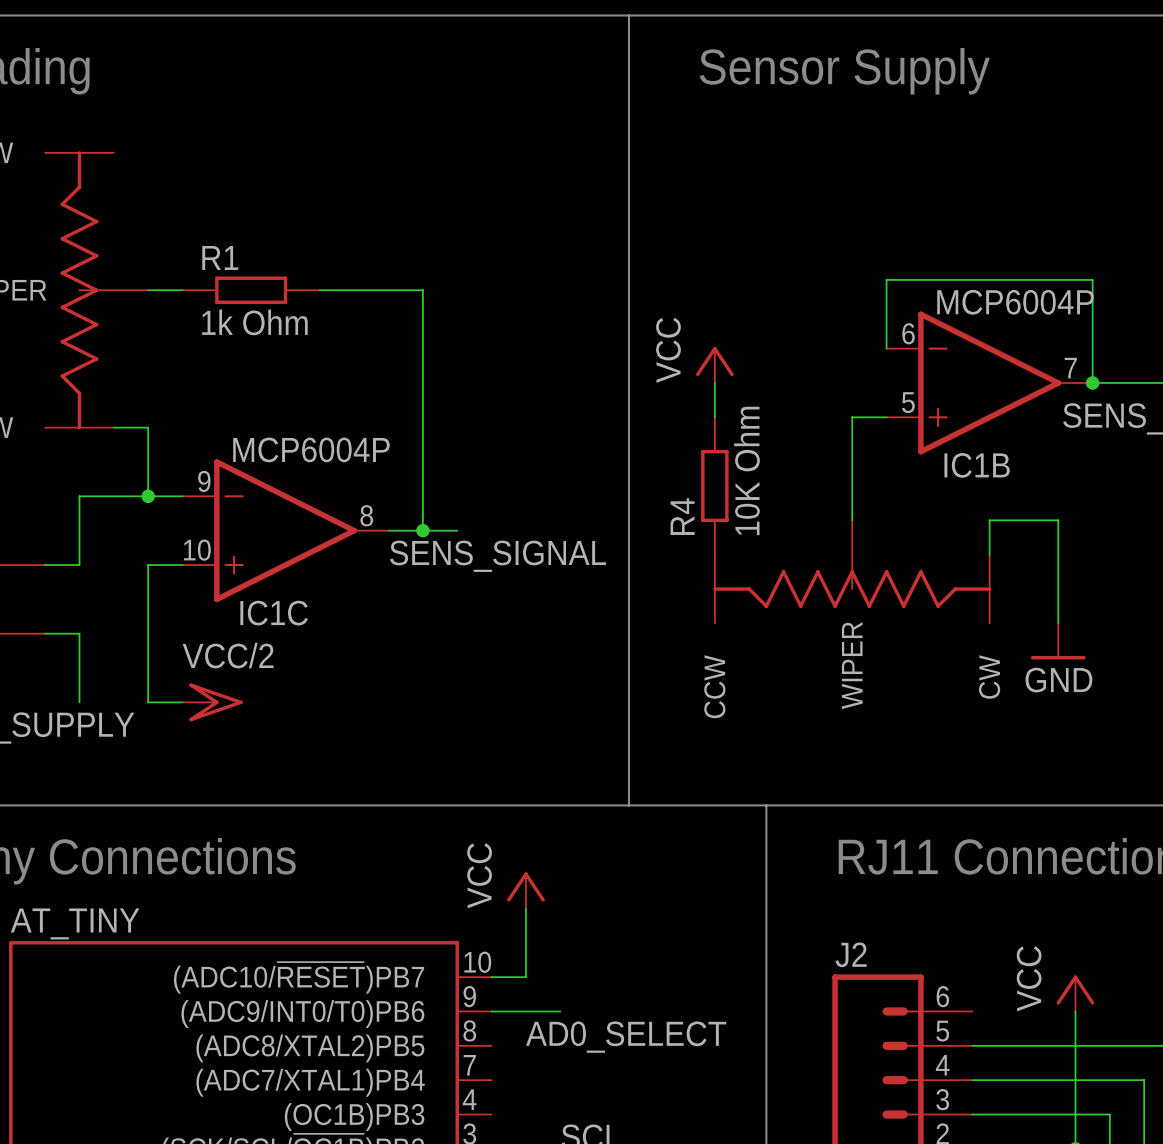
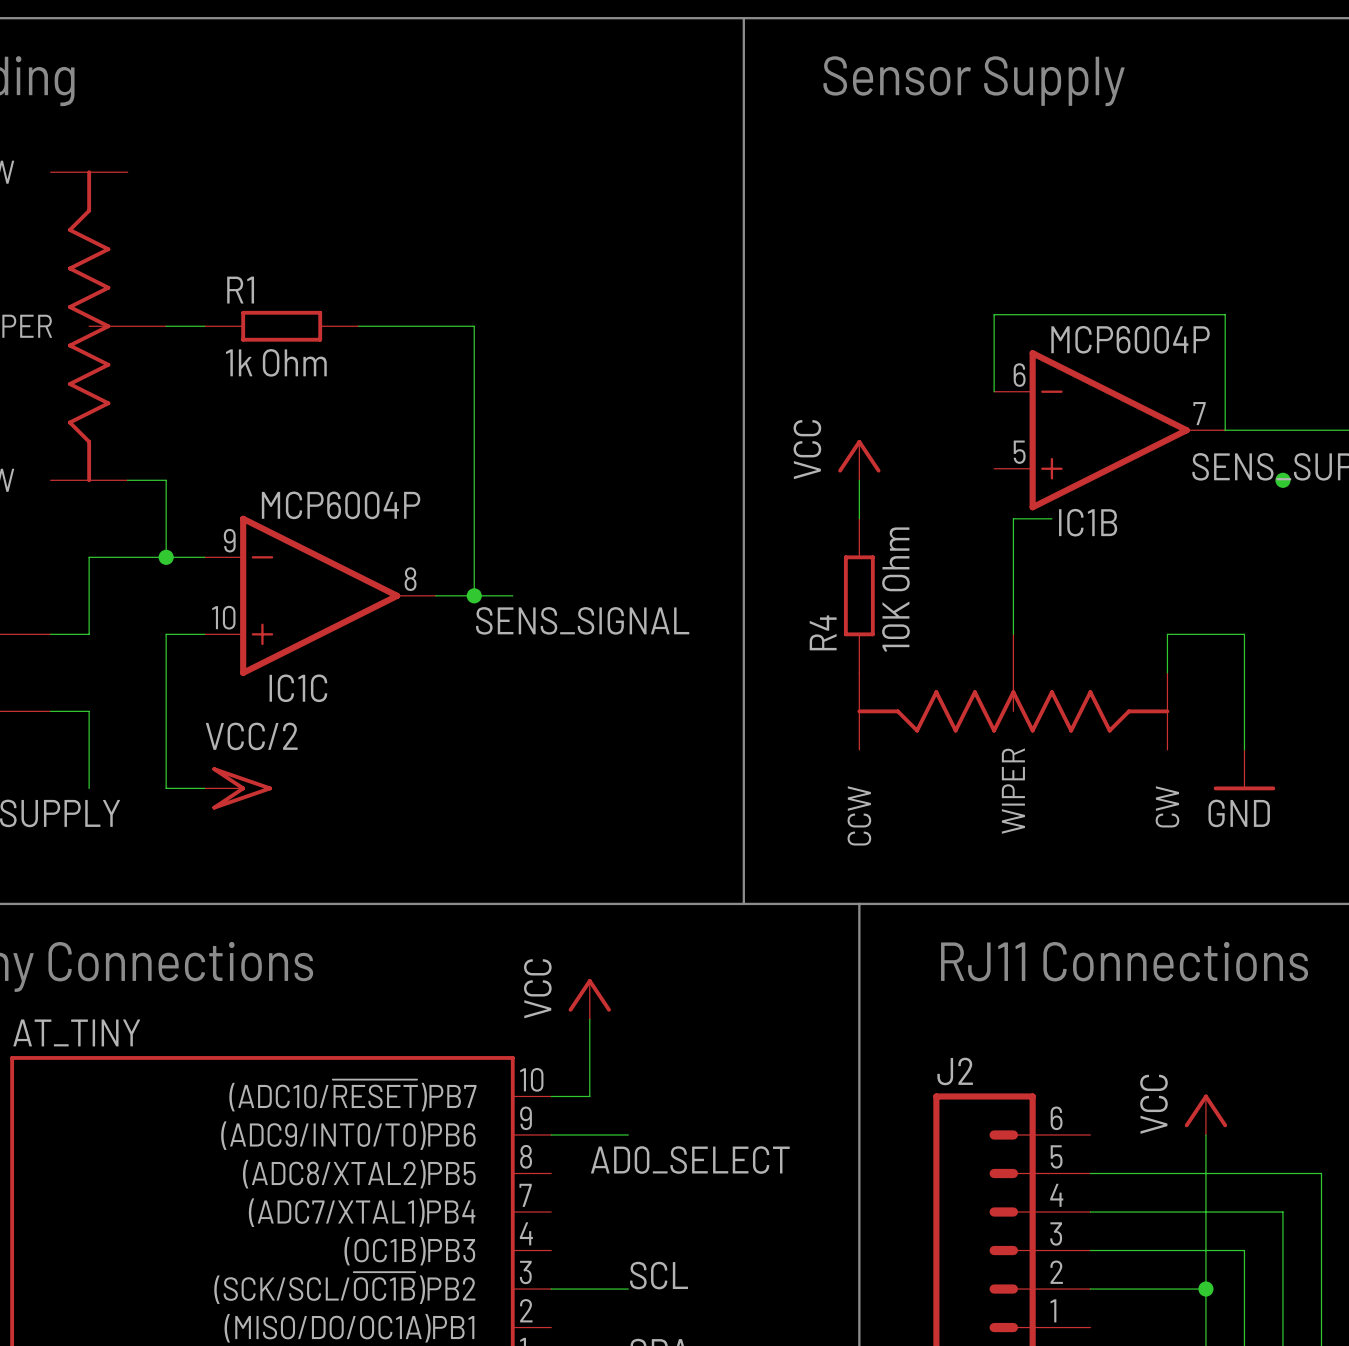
line: (628, 15) (628, 805) -> (743, 18) (743, 903)
text position: Sensor Supply (844, 71) -> Sensor Supply (974, 81)
power symbol position: VCC (714, 364) -> VCC (859, 460)
wire: (714, 382) (714, 417) -> (859, 480) (859, 518)
junction position: (1092, 382) -> (1282, 480)
wire: (886, 417) (852, 417) (852, 520) -> (1051, 518) (1013, 518) (1013, 634)
R4 position: (714, 486) -> (859, 595)
wire: (989, 554) (989, 520) (1058, 520) (1058, 623) -> (1167, 672) (1167, 634) (1244, 634) (1244, 749)
label position: SENS_SIGNAL (498, 556) -> SENS_SIGNAL (582, 620)
part position: (852, 571) -> (1013, 692)
power symbol position: GND (1058, 641) -> GND (1244, 770)

